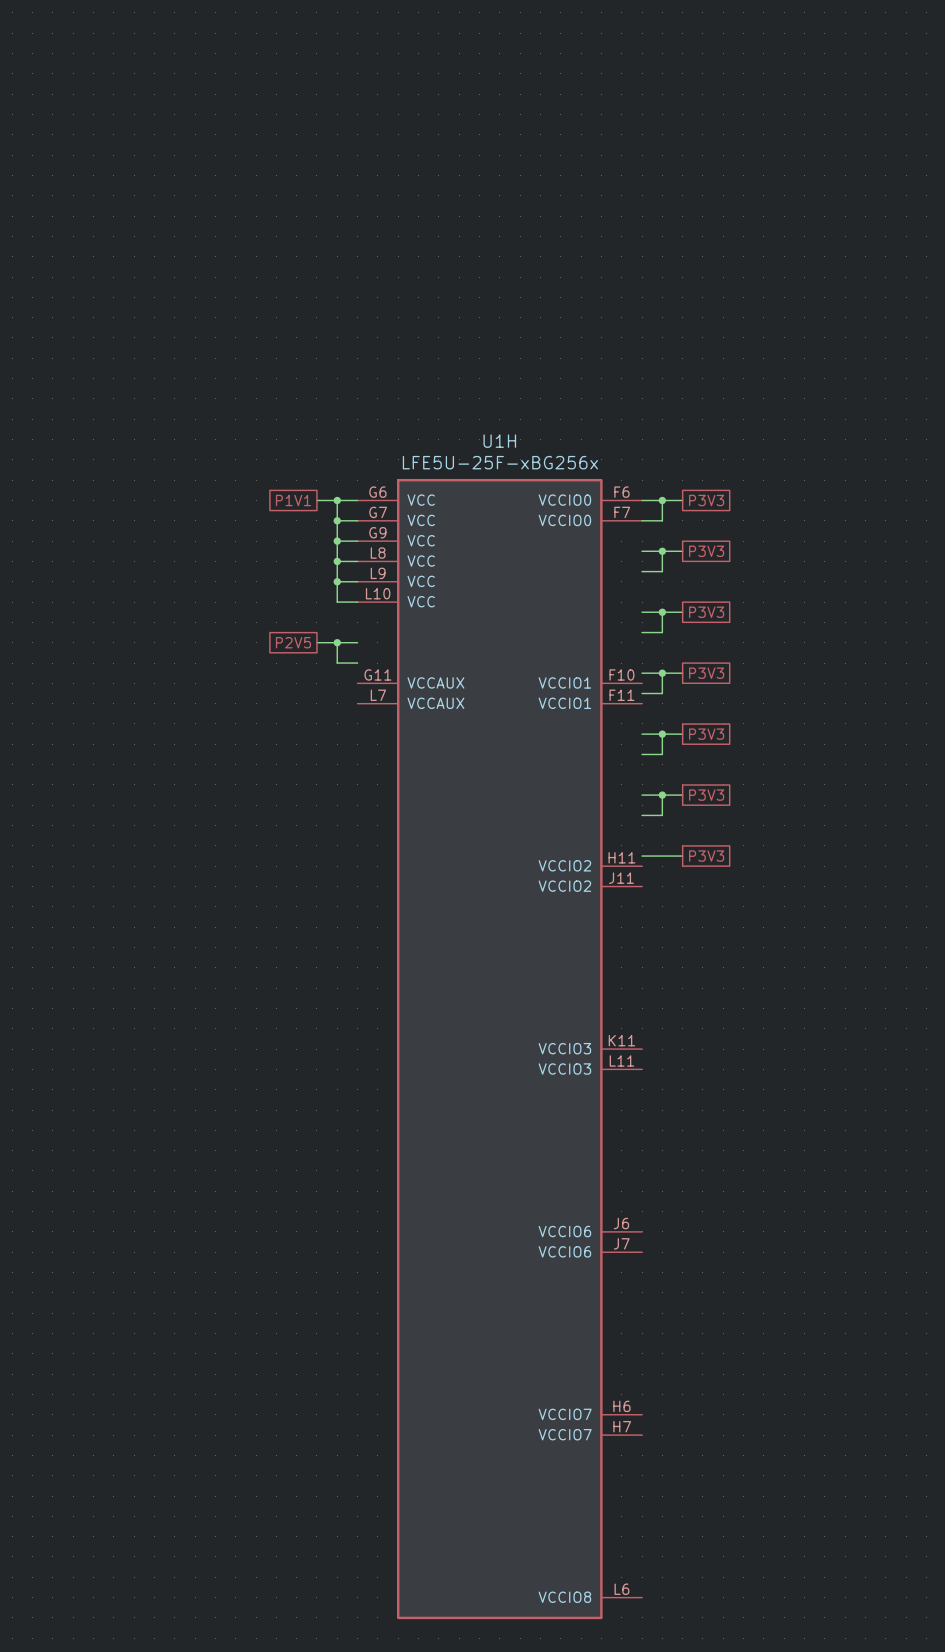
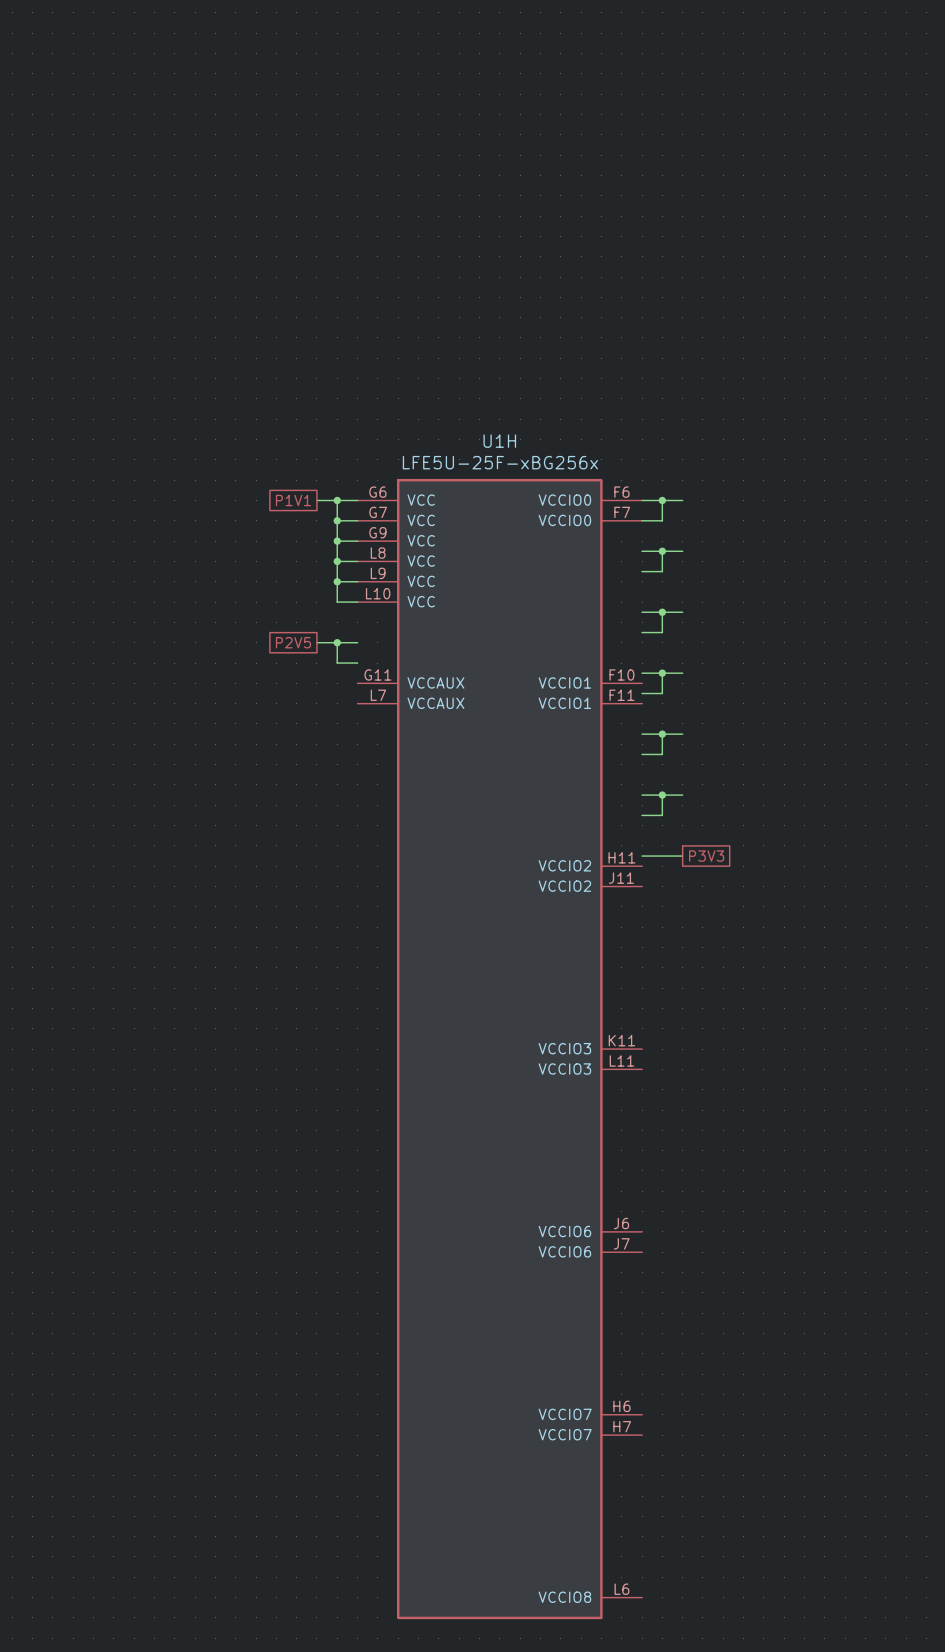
global label: P3V3 (706, 500) -> none
global label: P3V3 (706, 551) -> none
global label: P3V3 (706, 612) -> none
global label: P3V3 (706, 673) -> none
global label: P3V3 (706, 734) -> none
global label: P3V3 (706, 795) -> none

